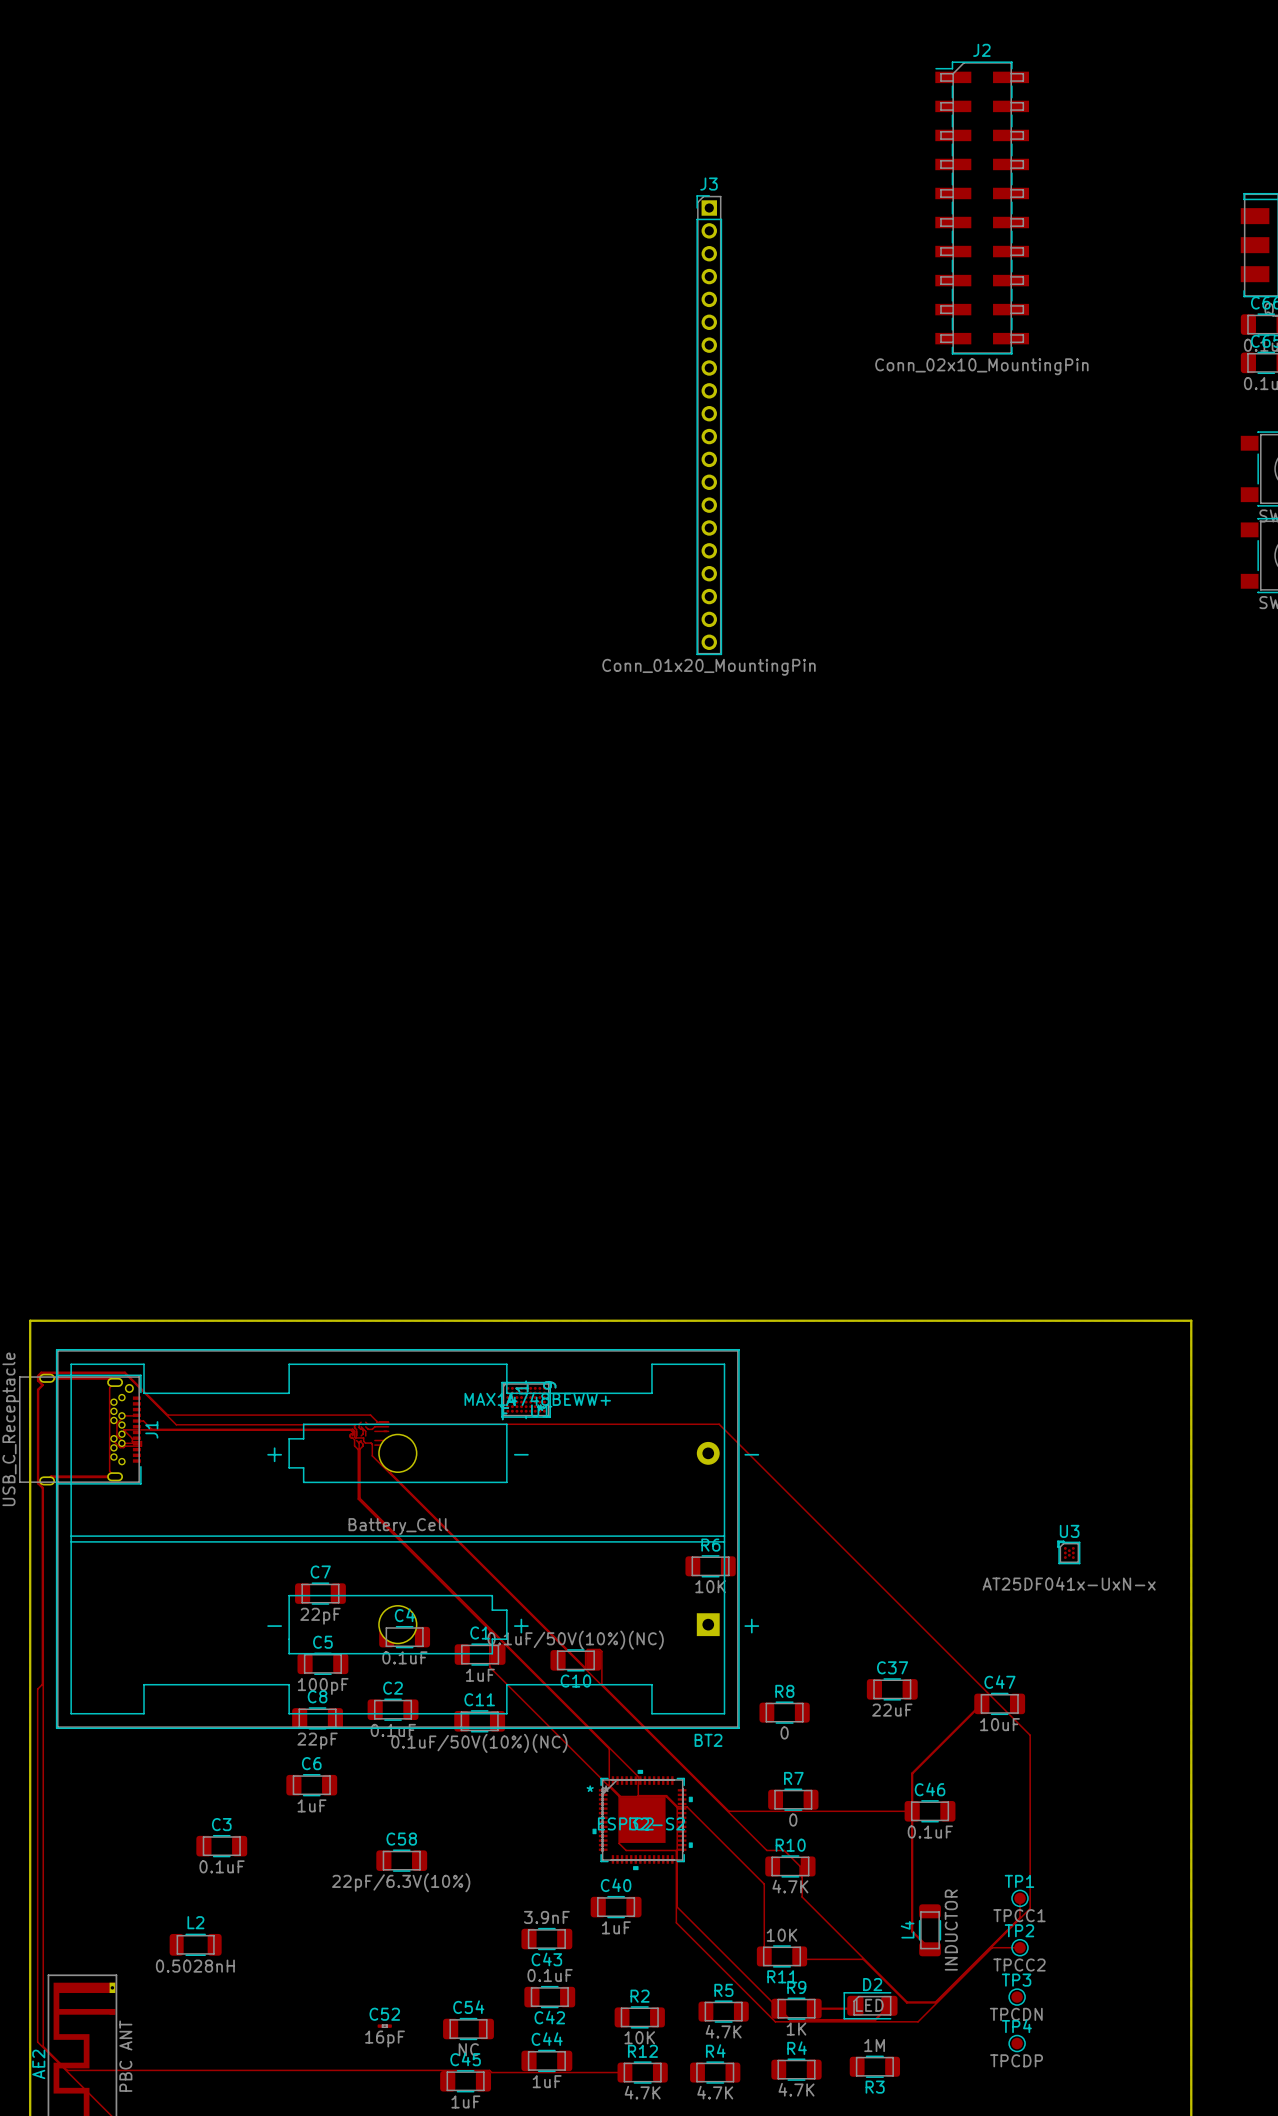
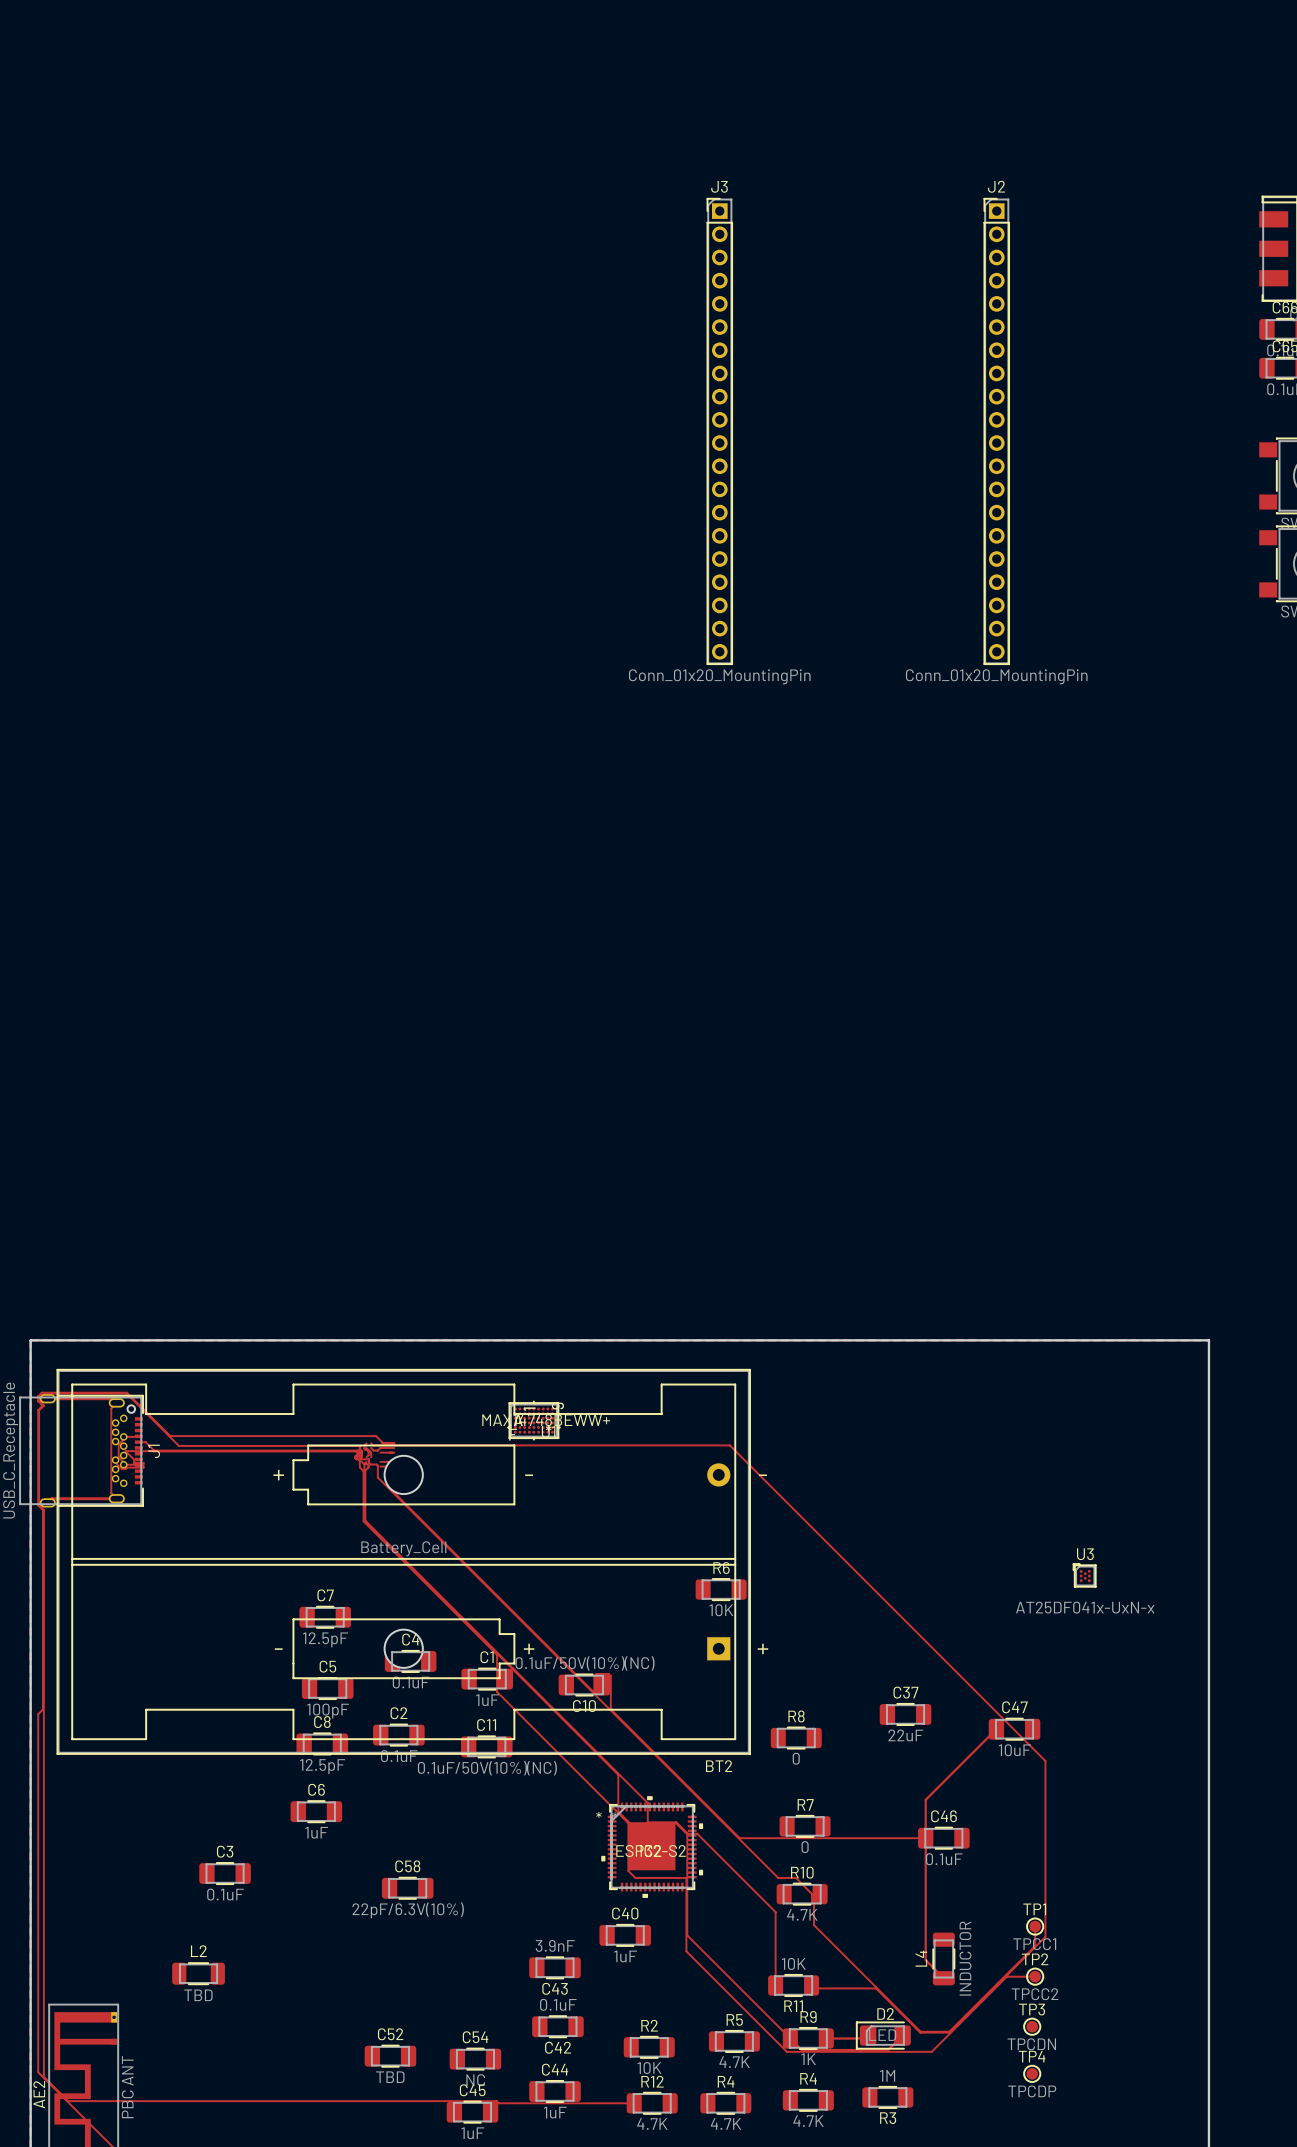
J2 name position: J2 (981, 50) -> J2 (996, 186)
J2 footprint: [935, 61, 1030, 355] -> [983, 198, 1010, 665]
J2 value: Conn_02x10_MountingPin (981, 366) -> Conn_01x20_MountingPin (996, 676)
C7 value: 22pF (320, 1616) -> 12.5pF (325, 1639)
C8 value: 22pF (317, 1741) -> 12.5pF (322, 1766)
L2 value: 0.5028nH (195, 1966) -> TBD (198, 1995)
C52 footprint: [377, 2024, 392, 2028] -> [364, 2044, 417, 2068]
C52 value: 16pF (385, 2039) -> TBD (390, 2077)

